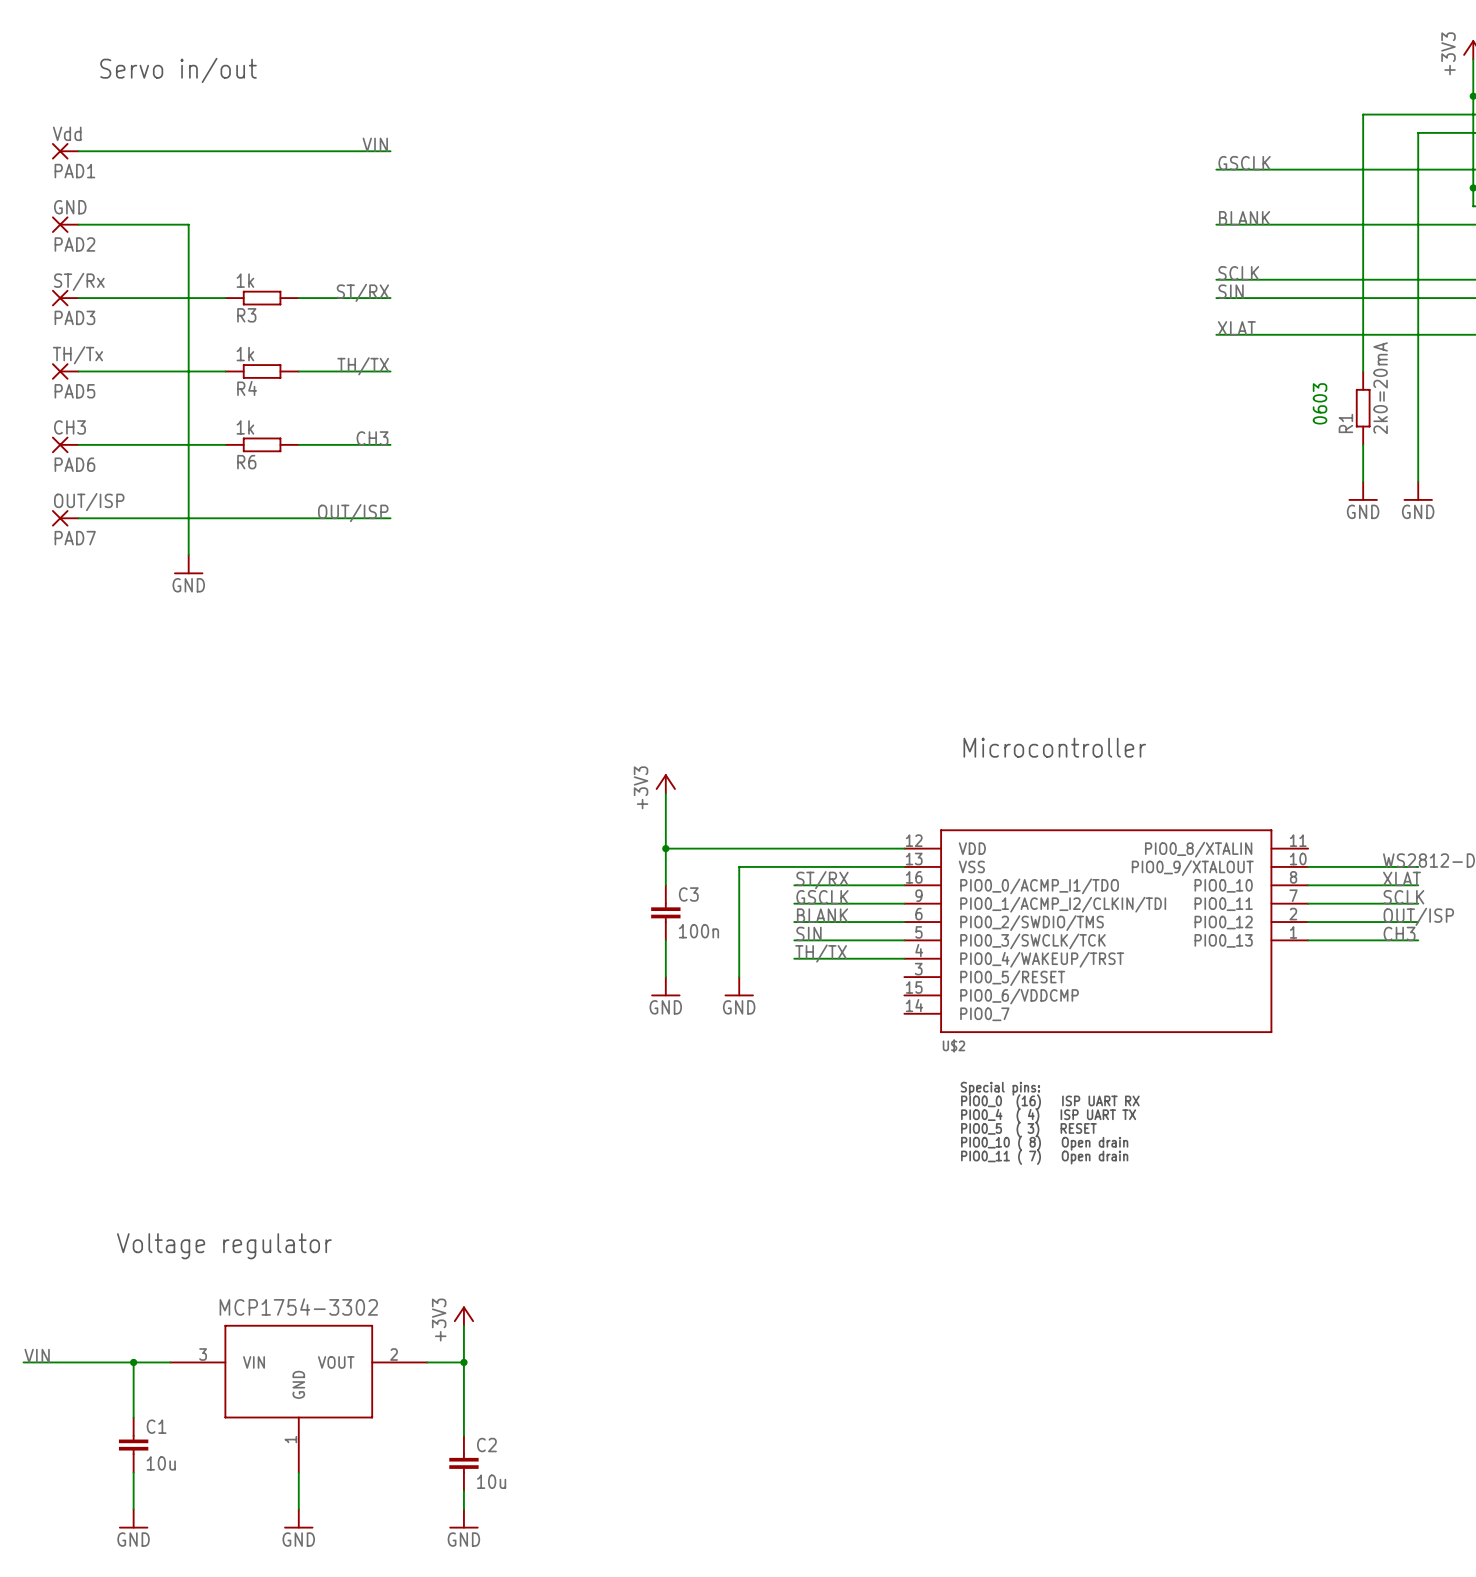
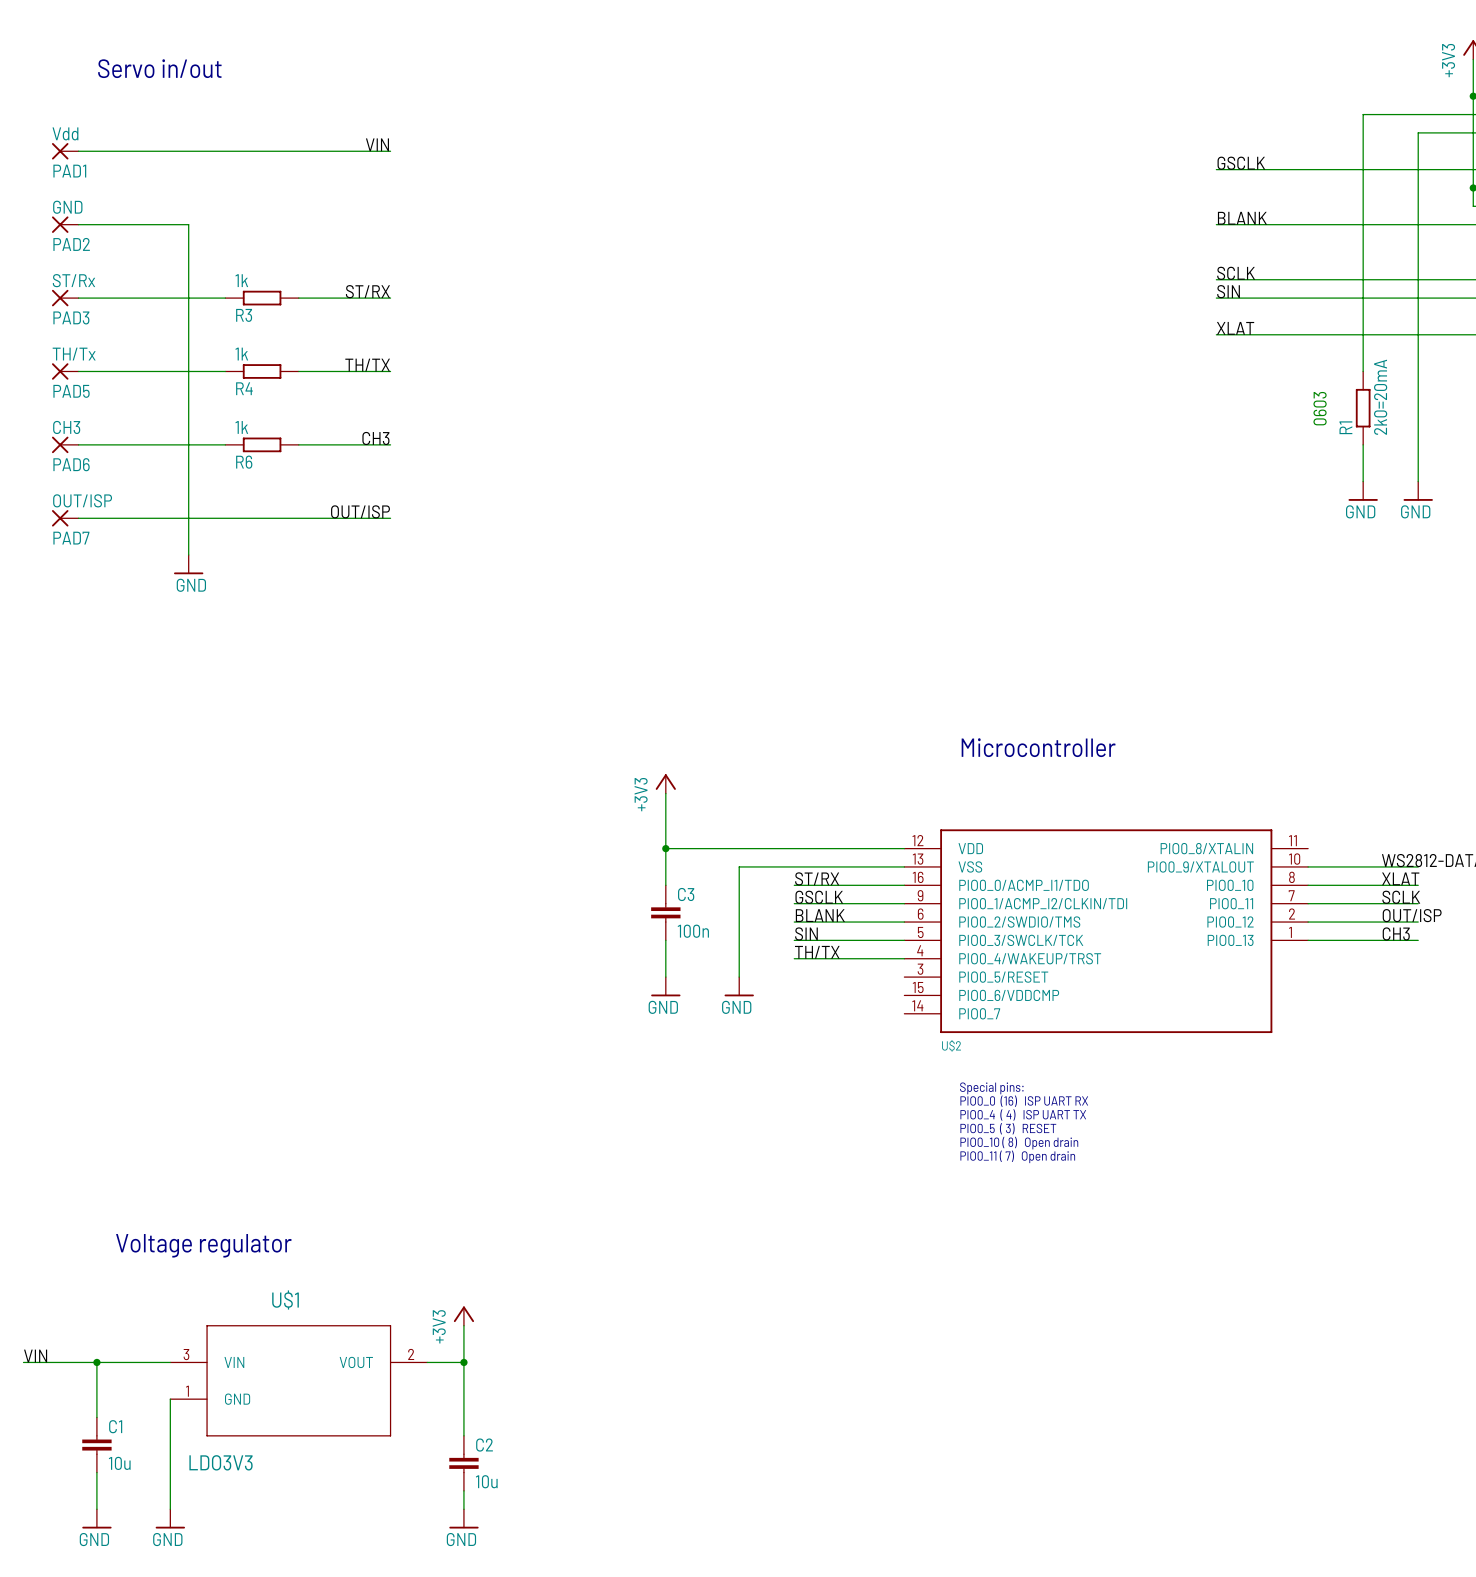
wire: (133, 1362) (133, 1417) -> (96, 1362) (96, 1417)
junction position: (133, 1362) -> (96, 1362)
U$1: none -> LDO3V3 (298, 1380)
part: (298, 1398) -> none
wire: none -> (170, 1399) (170, 1509)
C1 position: (133, 1445) -> (96, 1445)
wire: (133, 1472) (133, 1509) -> (96, 1472) (96, 1509)
wire: (298, 1472) (298, 1509) -> none
power symbol: none -> GND (96, 1518)
power symbol: GND (133, 1518) -> none
power symbol: none -> GND (170, 1518)
power symbol: GND (298, 1518) -> none

